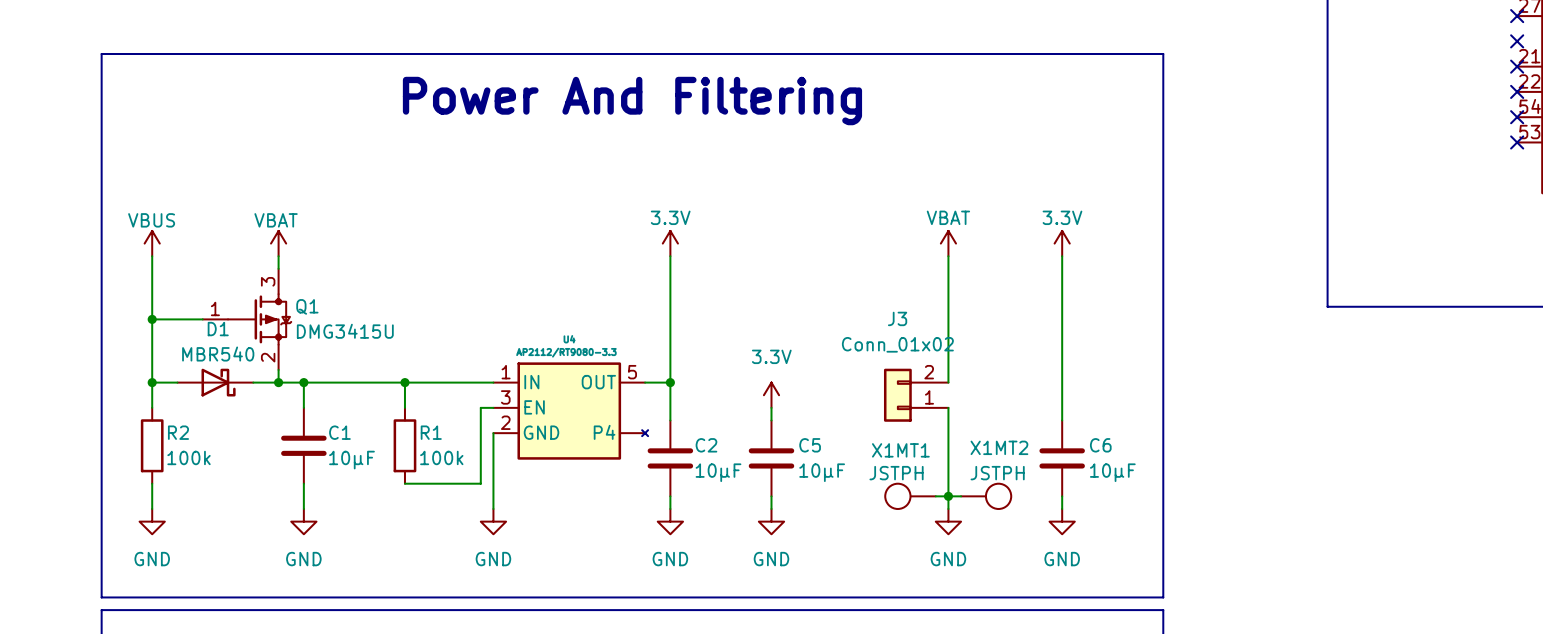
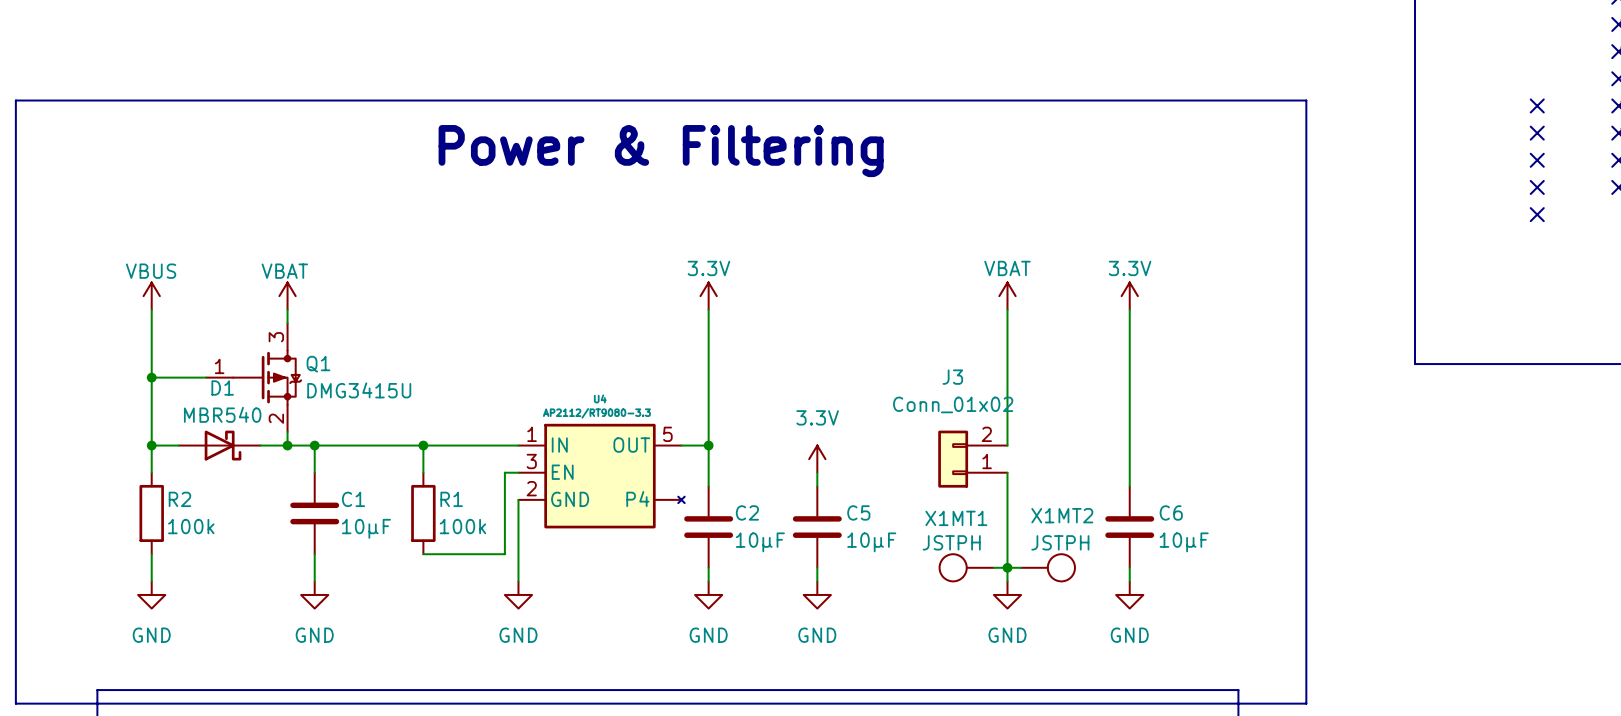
line: (101, 54) (1163, 54) (1163, 597) (101, 597) (101, 54) -> (15, 100) (15, 703) (1306, 703) (1306, 100) (15, 100)
no-connect mark: none -> (1537, 105)
no-connect mark: none -> (1537, 133)
text: Power And Filtering (632, 101) -> Power & Filtering (661, 151)
no-connect mark: none -> (1537, 160)
no-connect mark: none -> (1537, 187)
no-connect mark: none -> (1537, 214)

